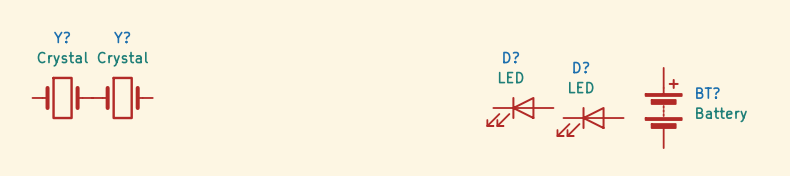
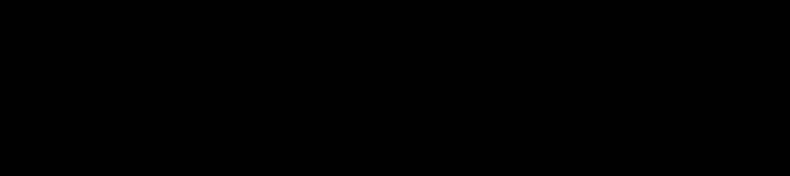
Y?: Crystal (62, 97) -> none
Y?: Crystal (122, 97) -> none
BT?: Battery (663, 108) -> none
D?: LED (520, 111) -> none
D?: LED (590, 121) -> none

